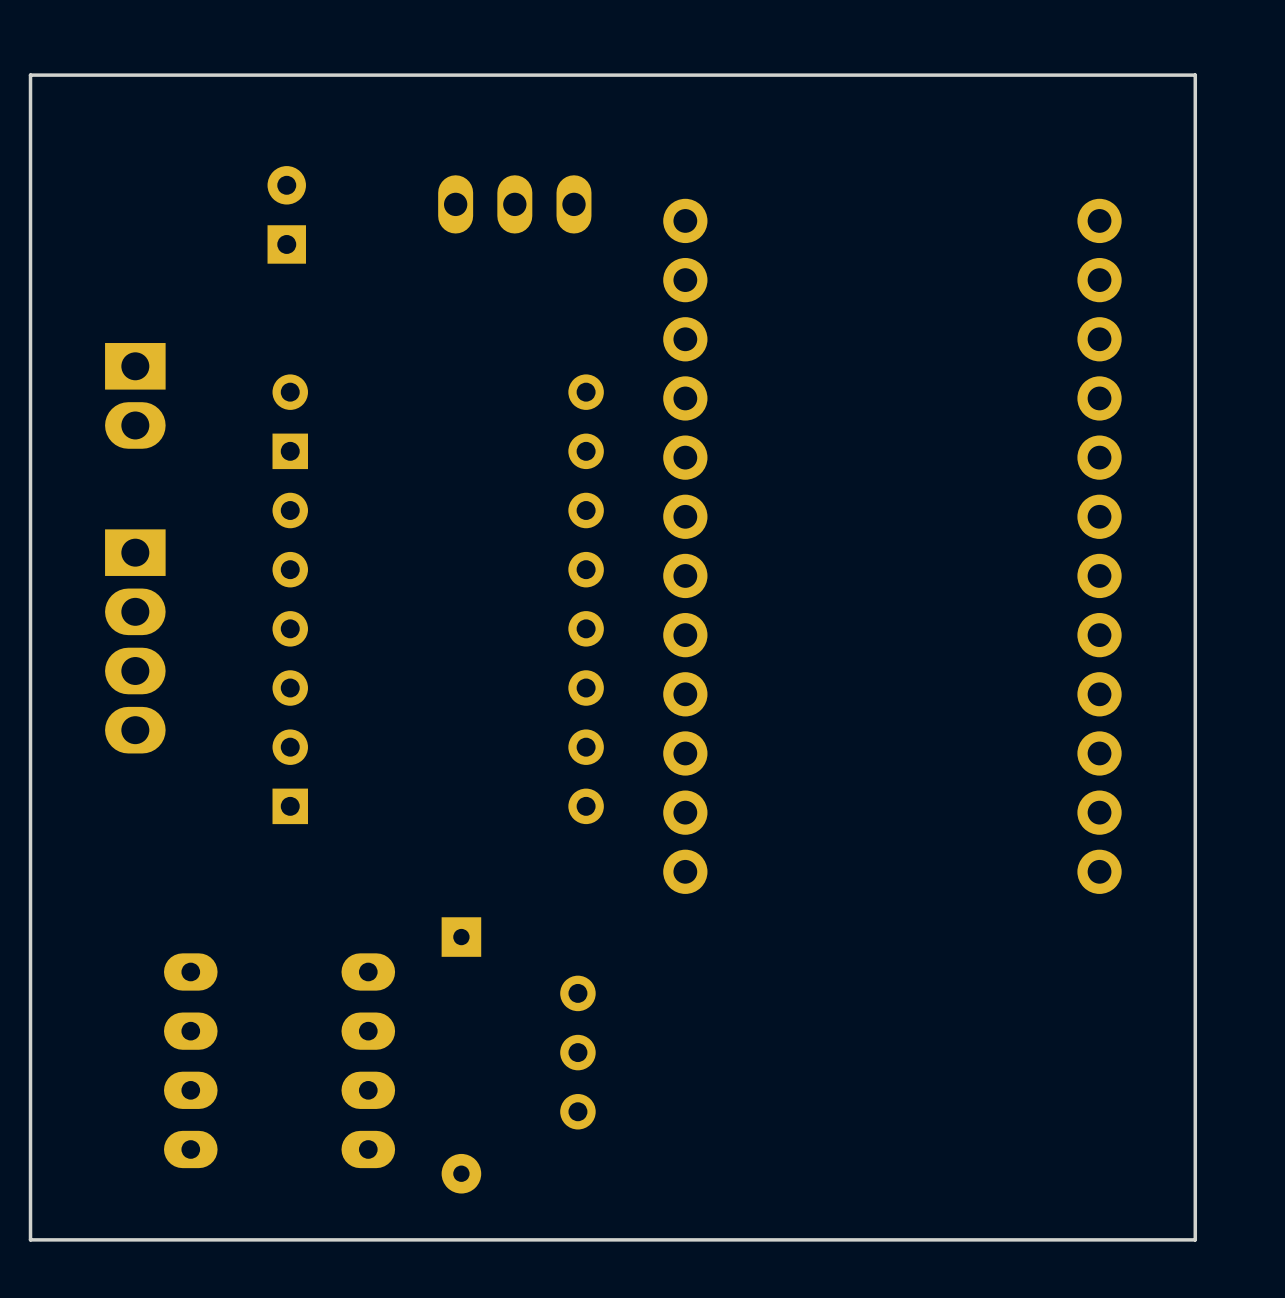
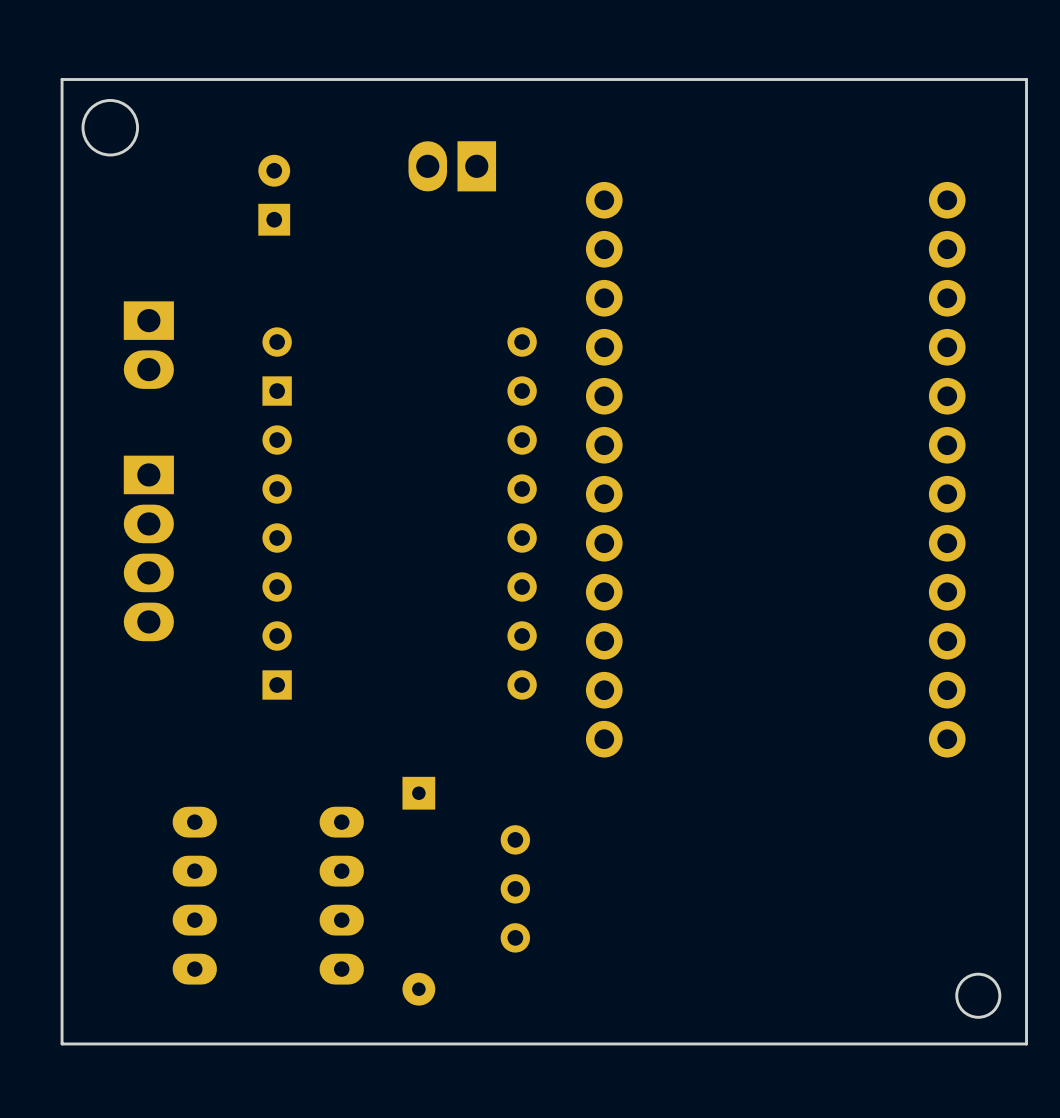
round board edge: none -> [81, 99, 140, 157]
part: none -> (452, 166)
part: (514, 204) -> none
round board edge: none -> [955, 972, 1002, 1019]

